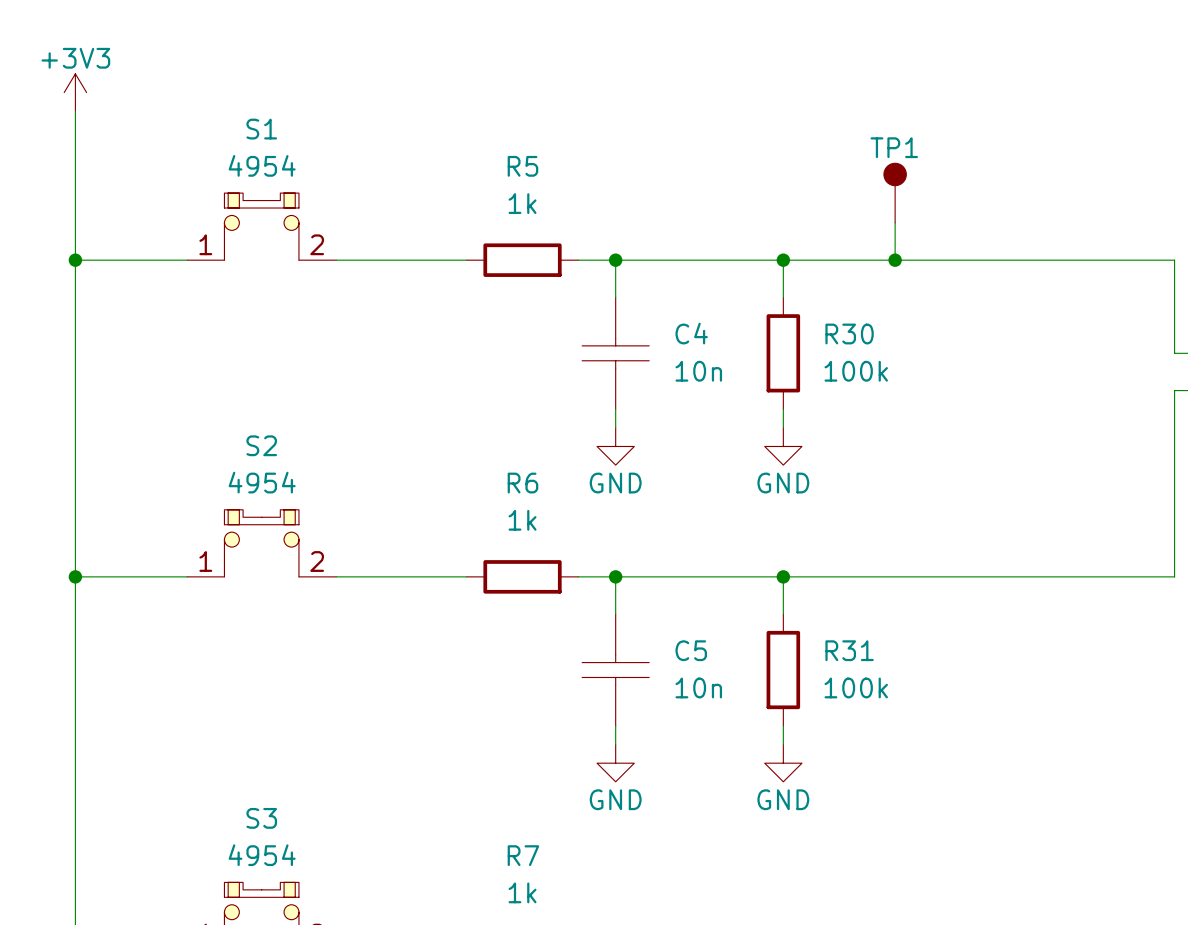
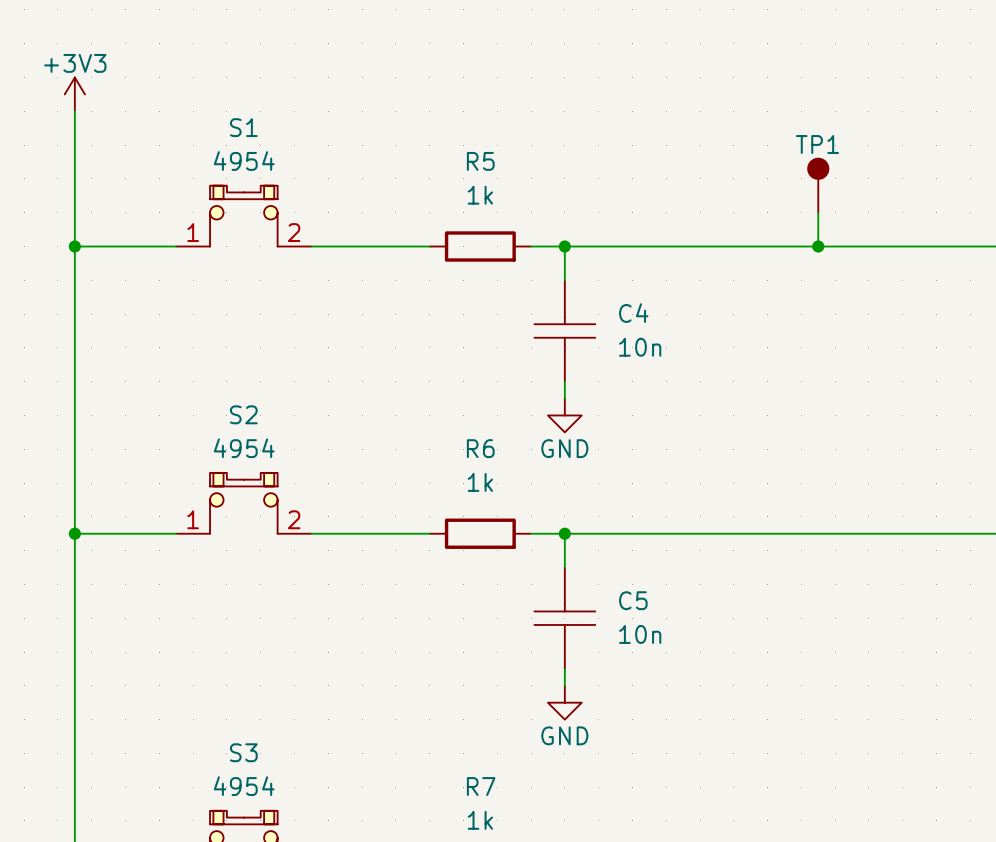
wire: (783, 260) (783, 297) -> none
junction: (783, 260) -> none
R30: 100k (783, 353) -> none
wire: (783, 409) (783, 427) -> none
power symbol: GND (783, 446) -> none
wire: (783, 576) (783, 614) -> none
junction: (783, 576) -> none
R31: 100k (783, 670) -> none
wire: (783, 725) (783, 744) -> none
power symbol: GND (783, 763) -> none

